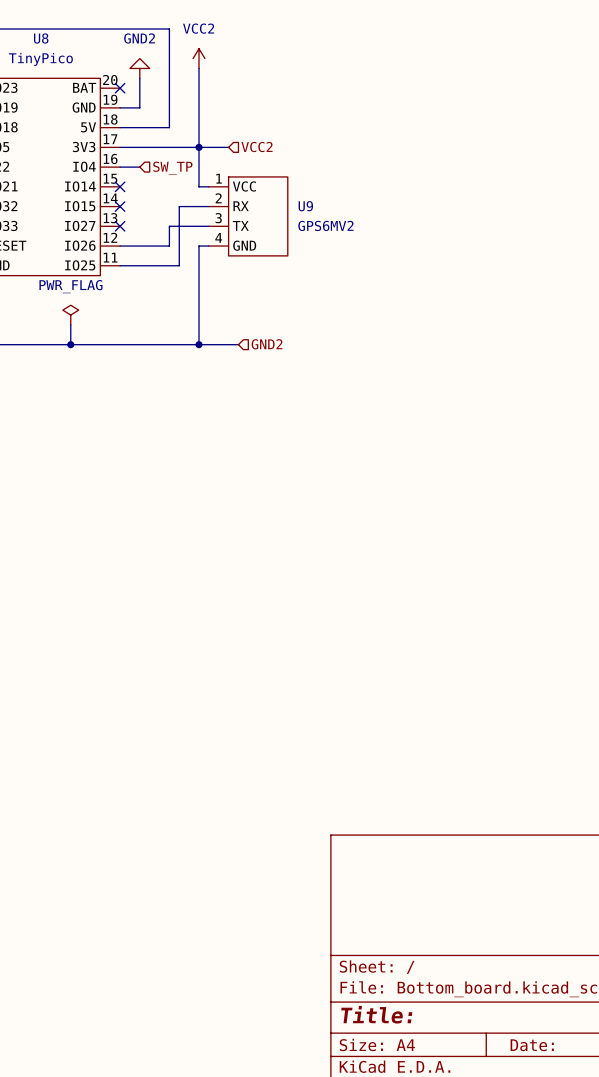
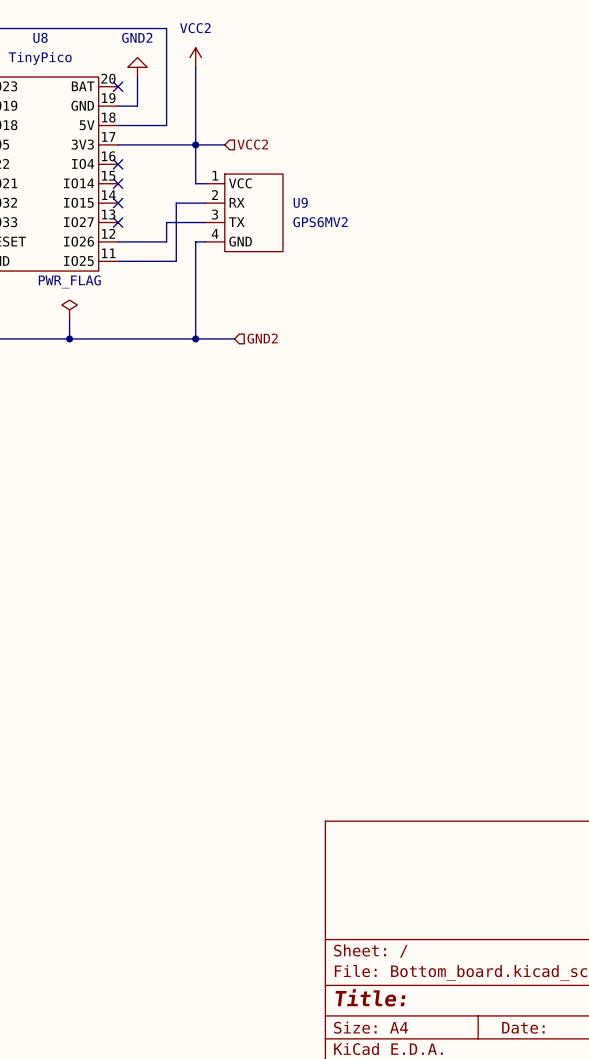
wire: (120, 167) (139, 167) -> none
no-connect mark: none -> (118, 164)
hierarchical label: SW_TP (172, 168) -> none

